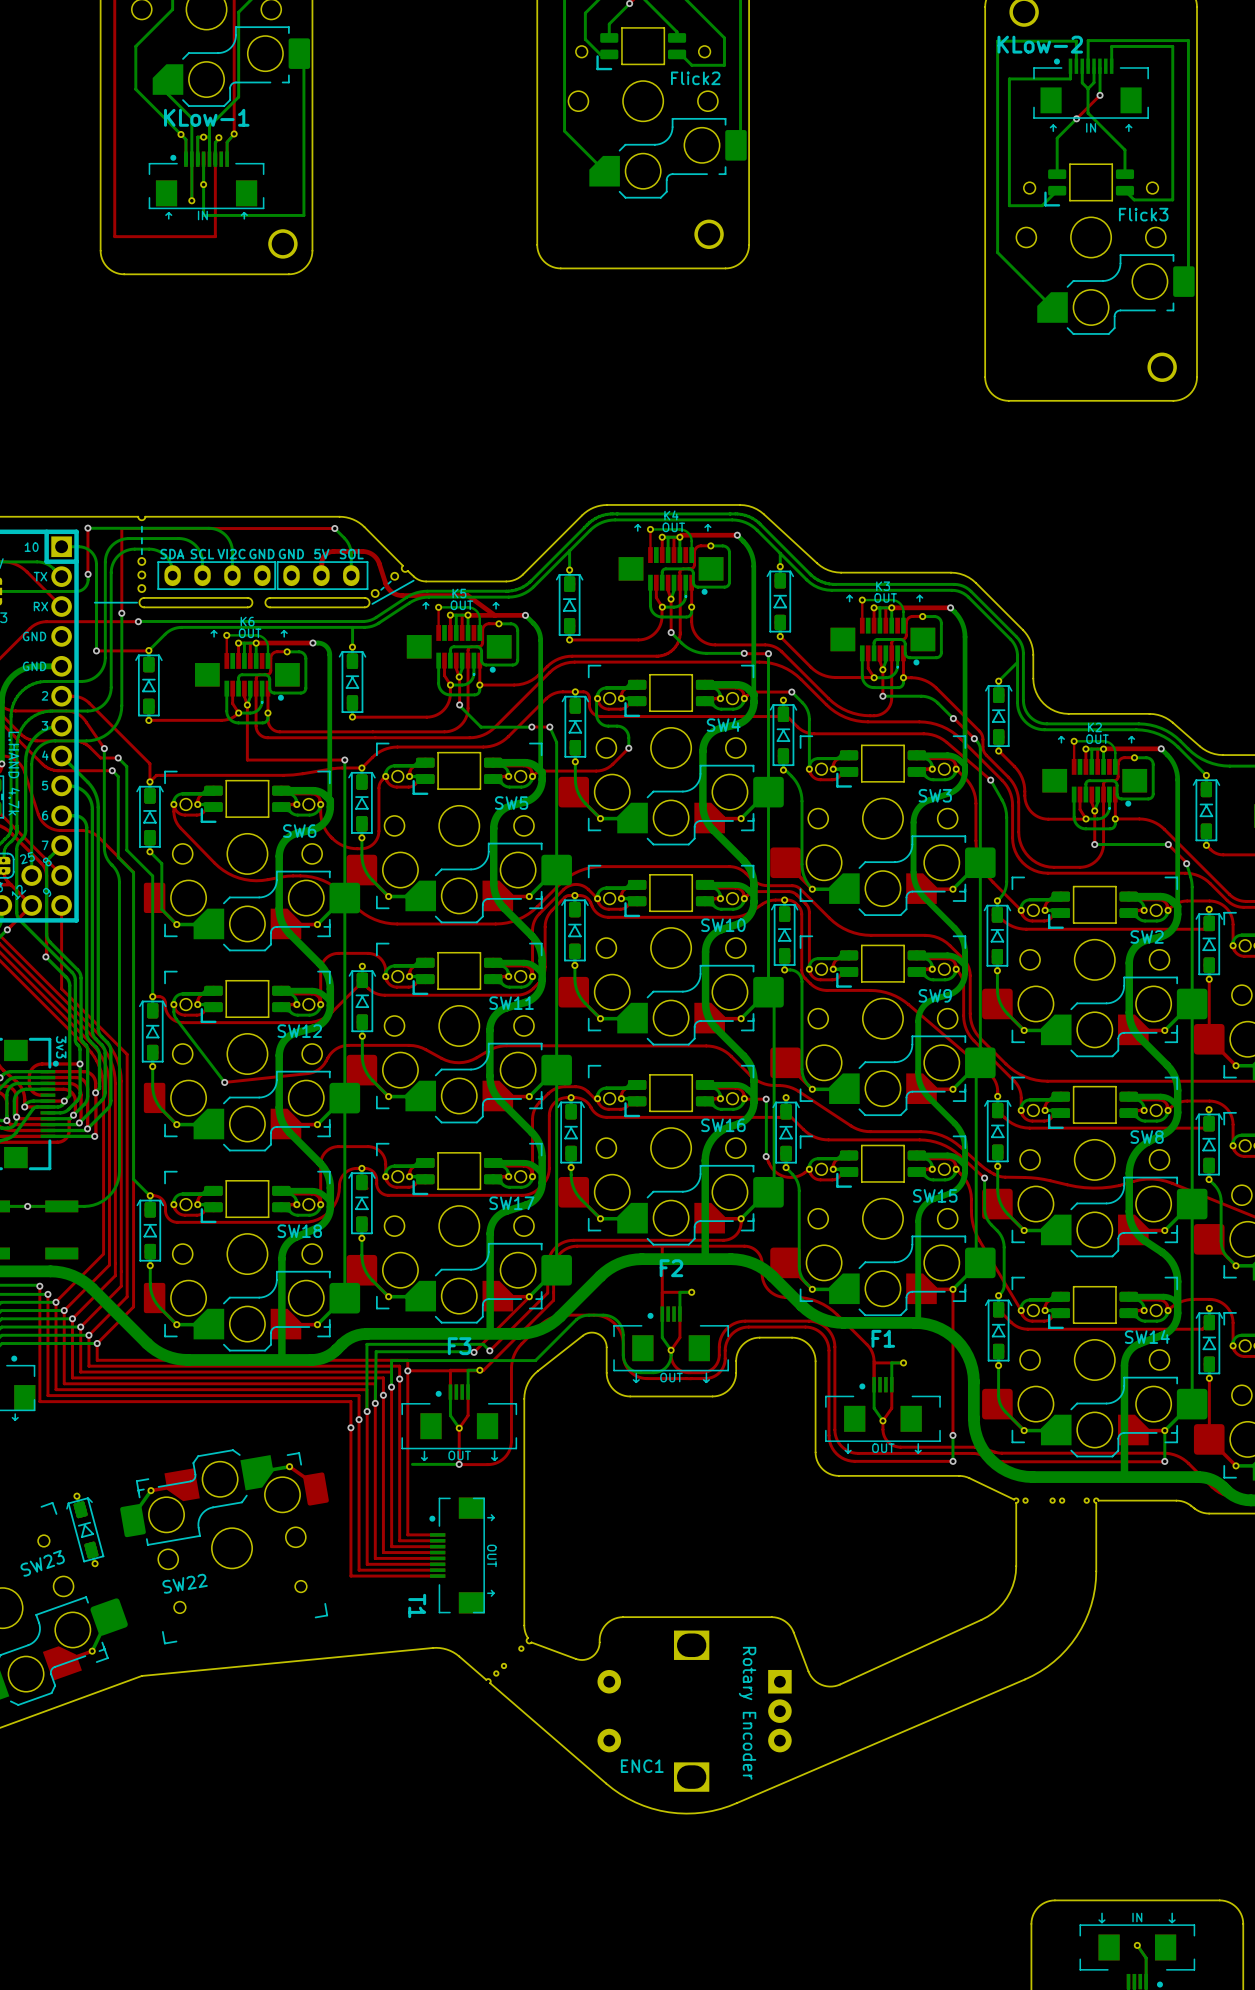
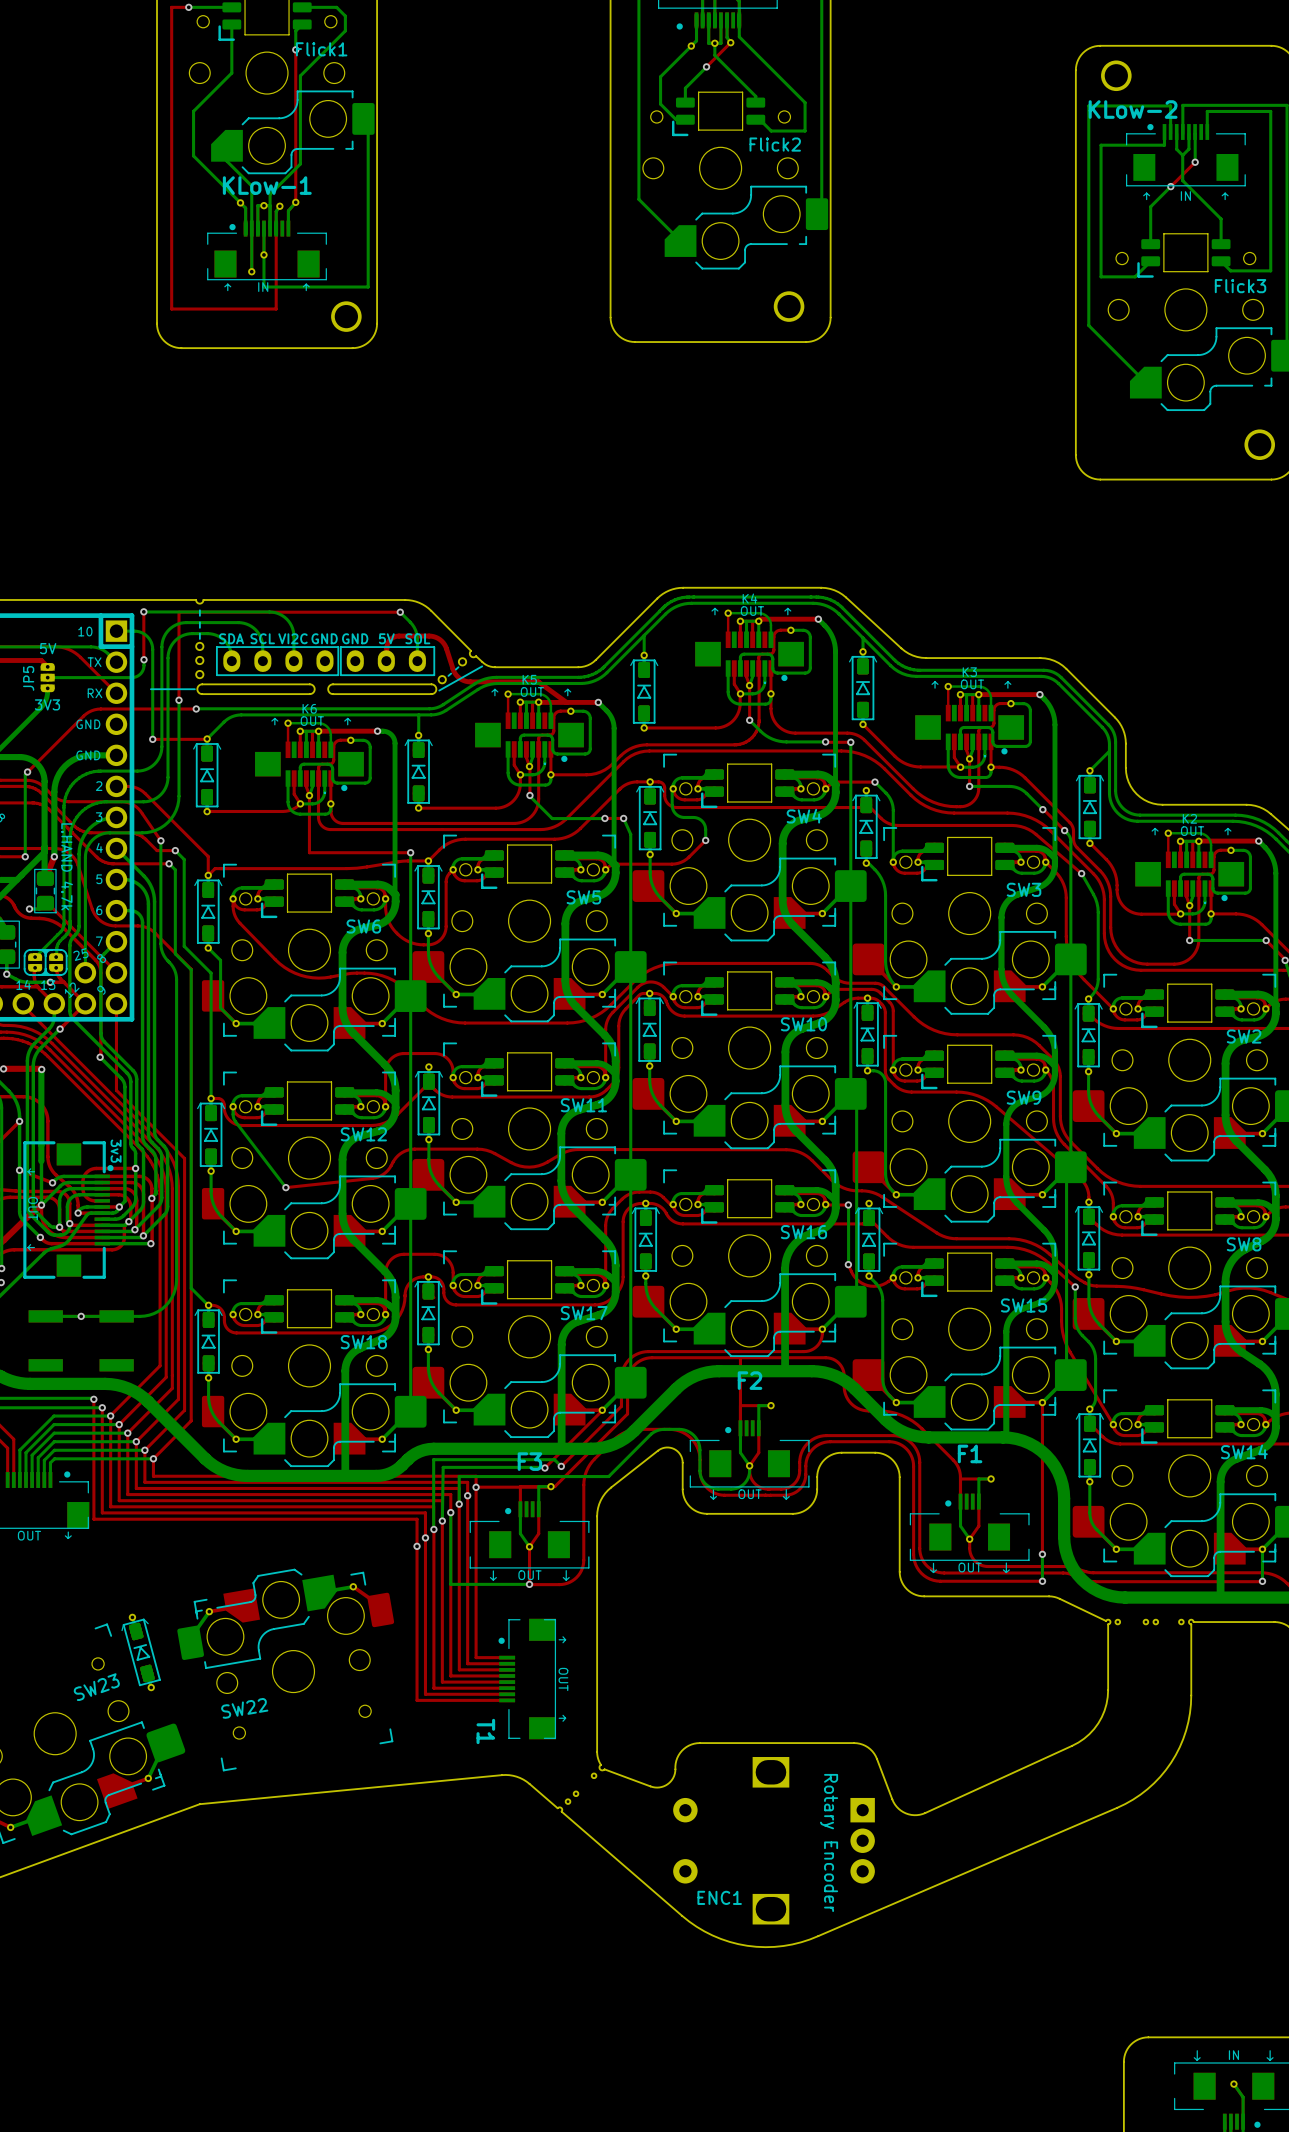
bottom track: none -> (450, 1512) (450, 1584) (480, 1584)

